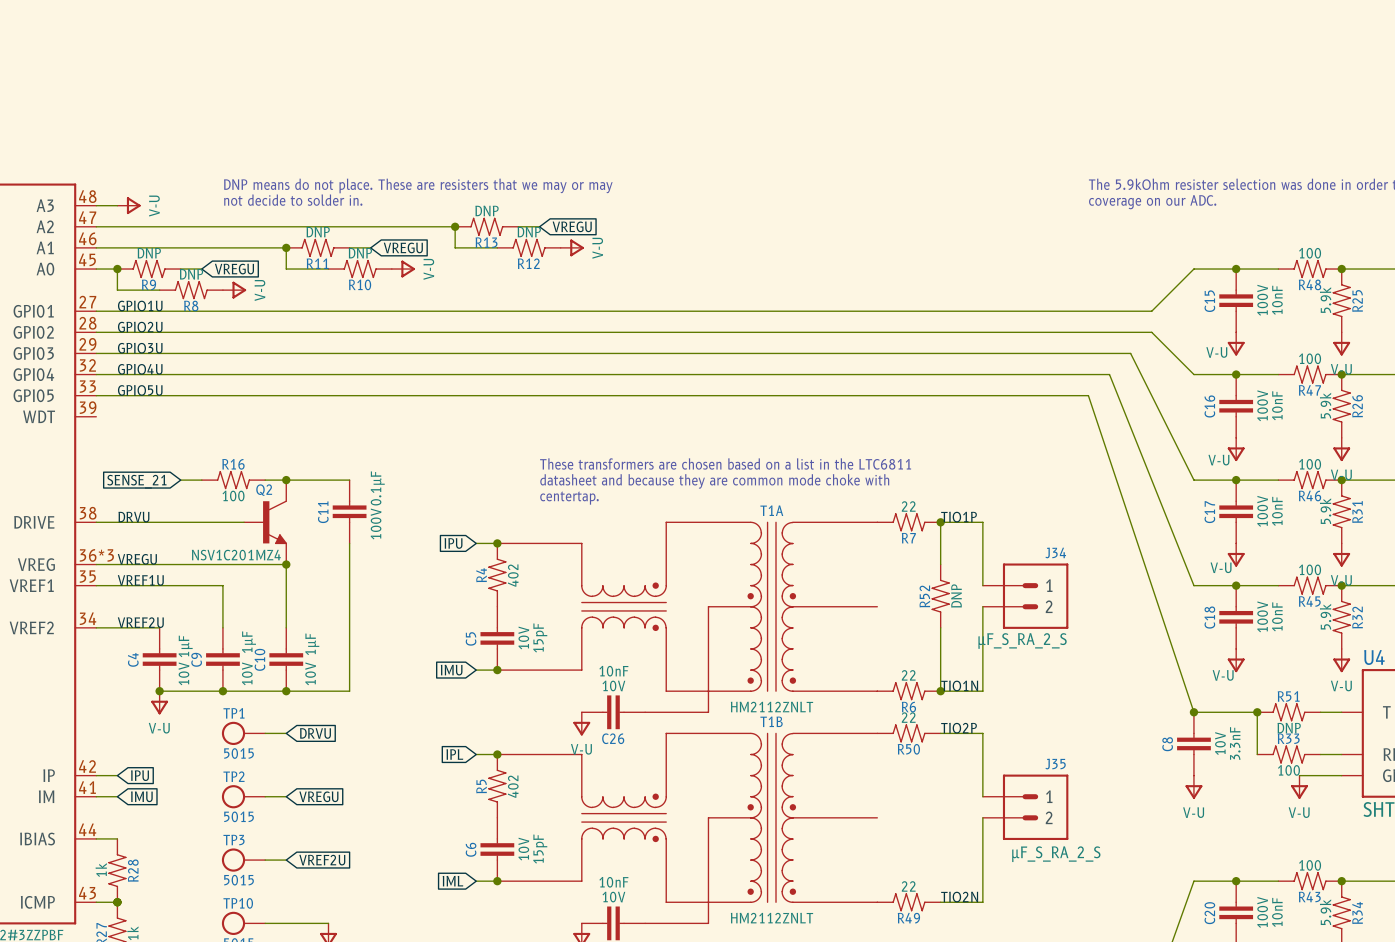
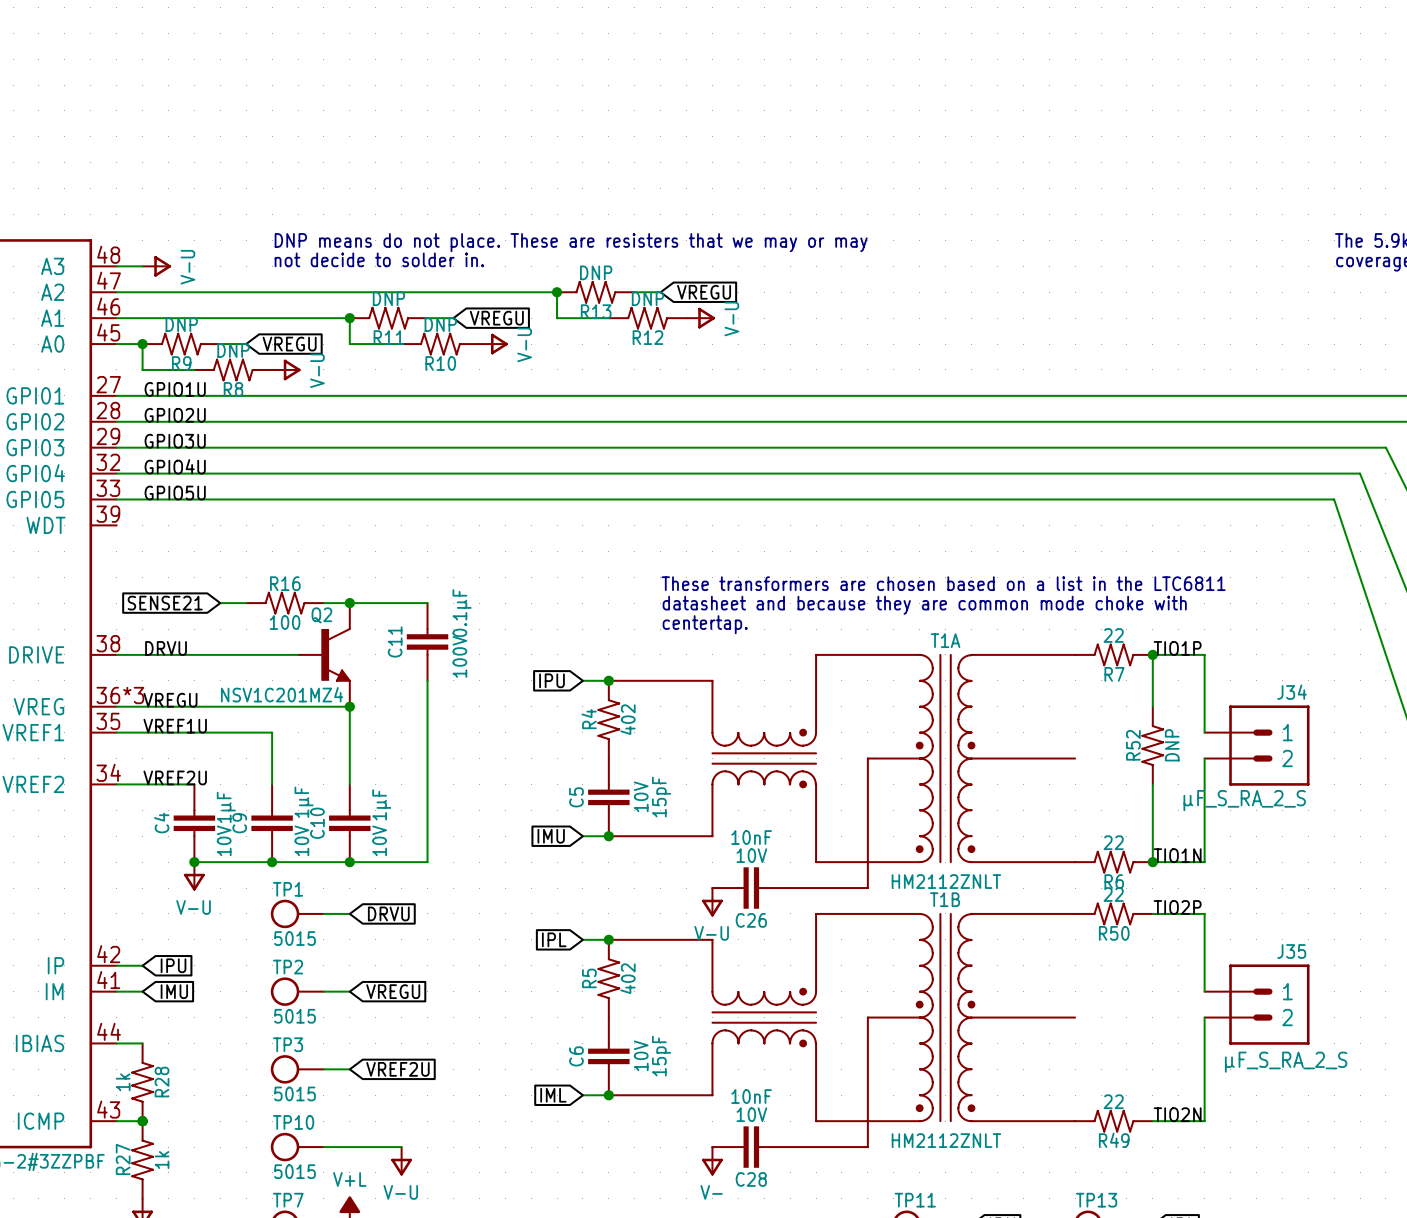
global label: SENSE_21 (136, 481) -> SENSE21 (165, 603)

